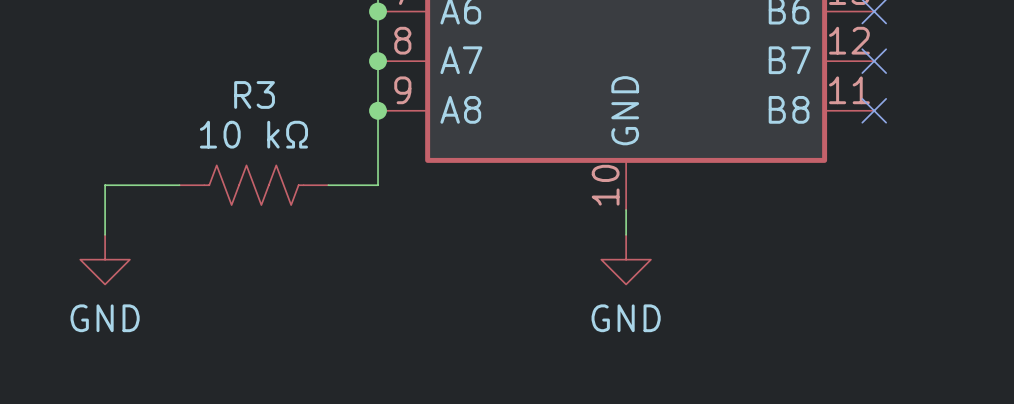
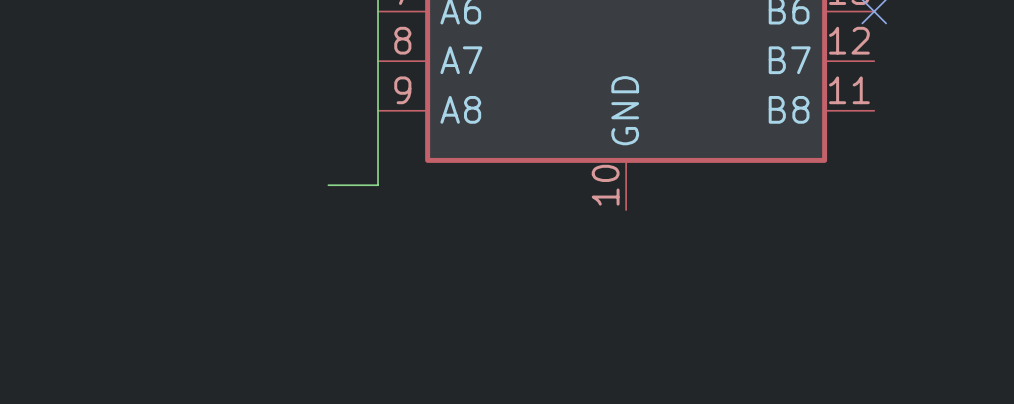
junction: (378, 11) -> none
junction: (378, 61) -> none
no-connect mark: (874, 61) -> none
junction: (378, 110) -> none
no-connect mark: (874, 110) -> none
wire: (179, 185) (105, 185) (105, 234) -> none
R3: 10 kΩ (253, 185) -> none
wire: (626, 210) (626, 234) -> none
power symbol: GND (105, 259) -> none
power symbol: GND (626, 259) -> none

